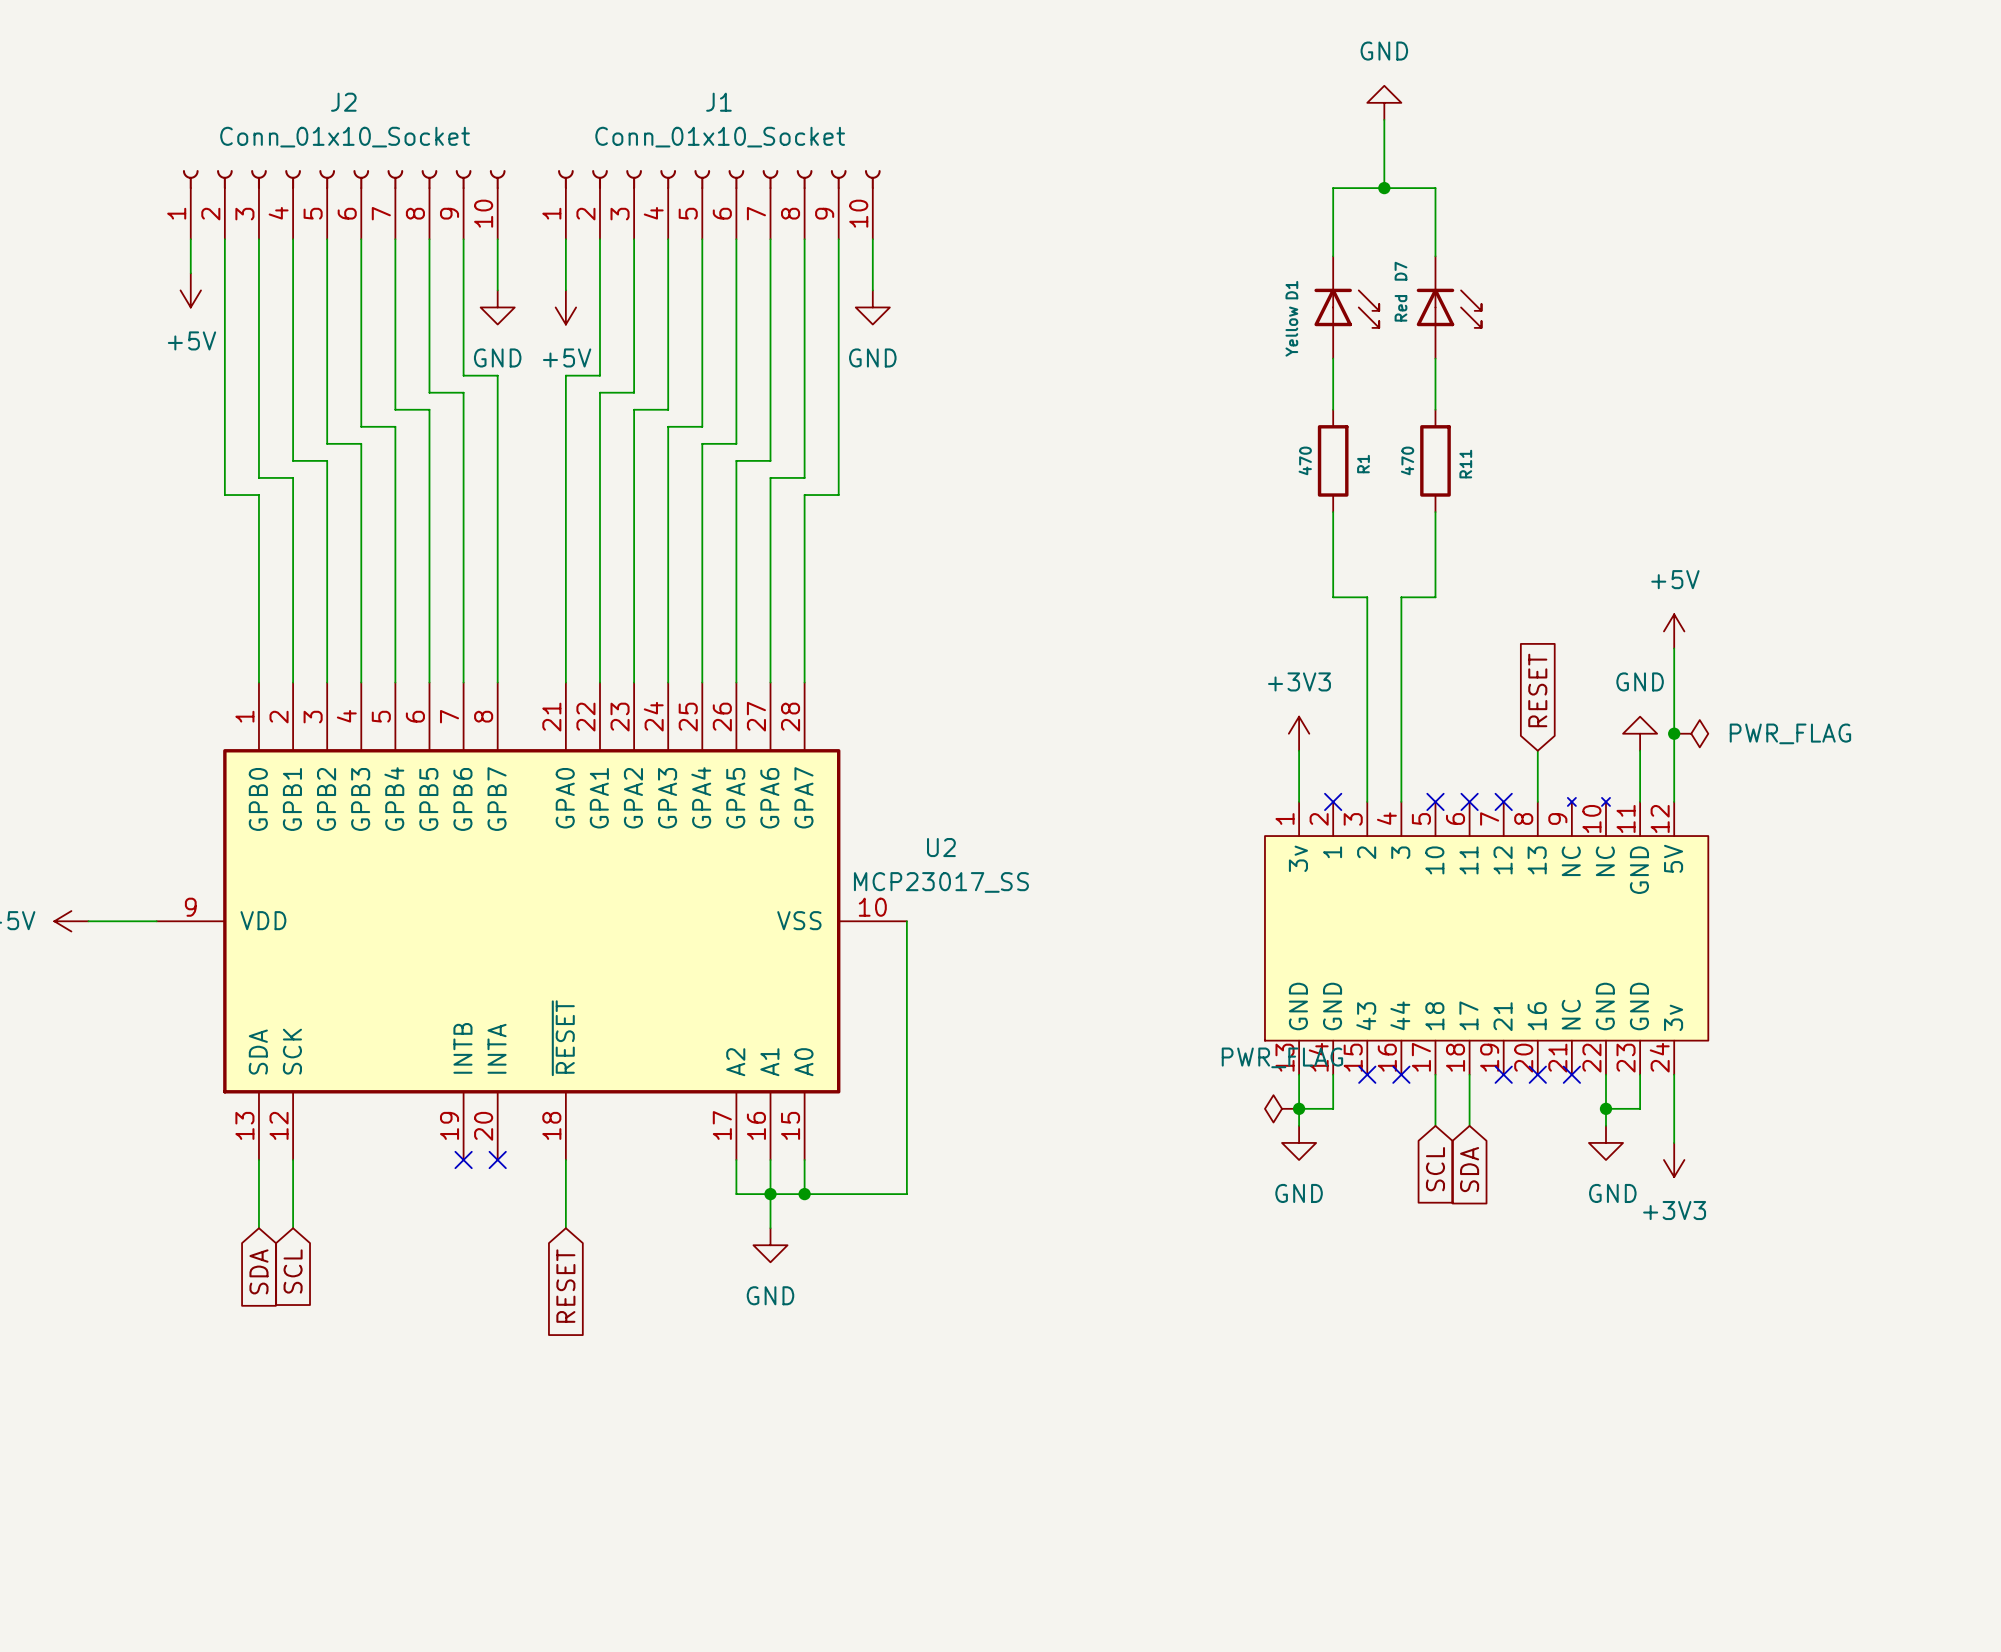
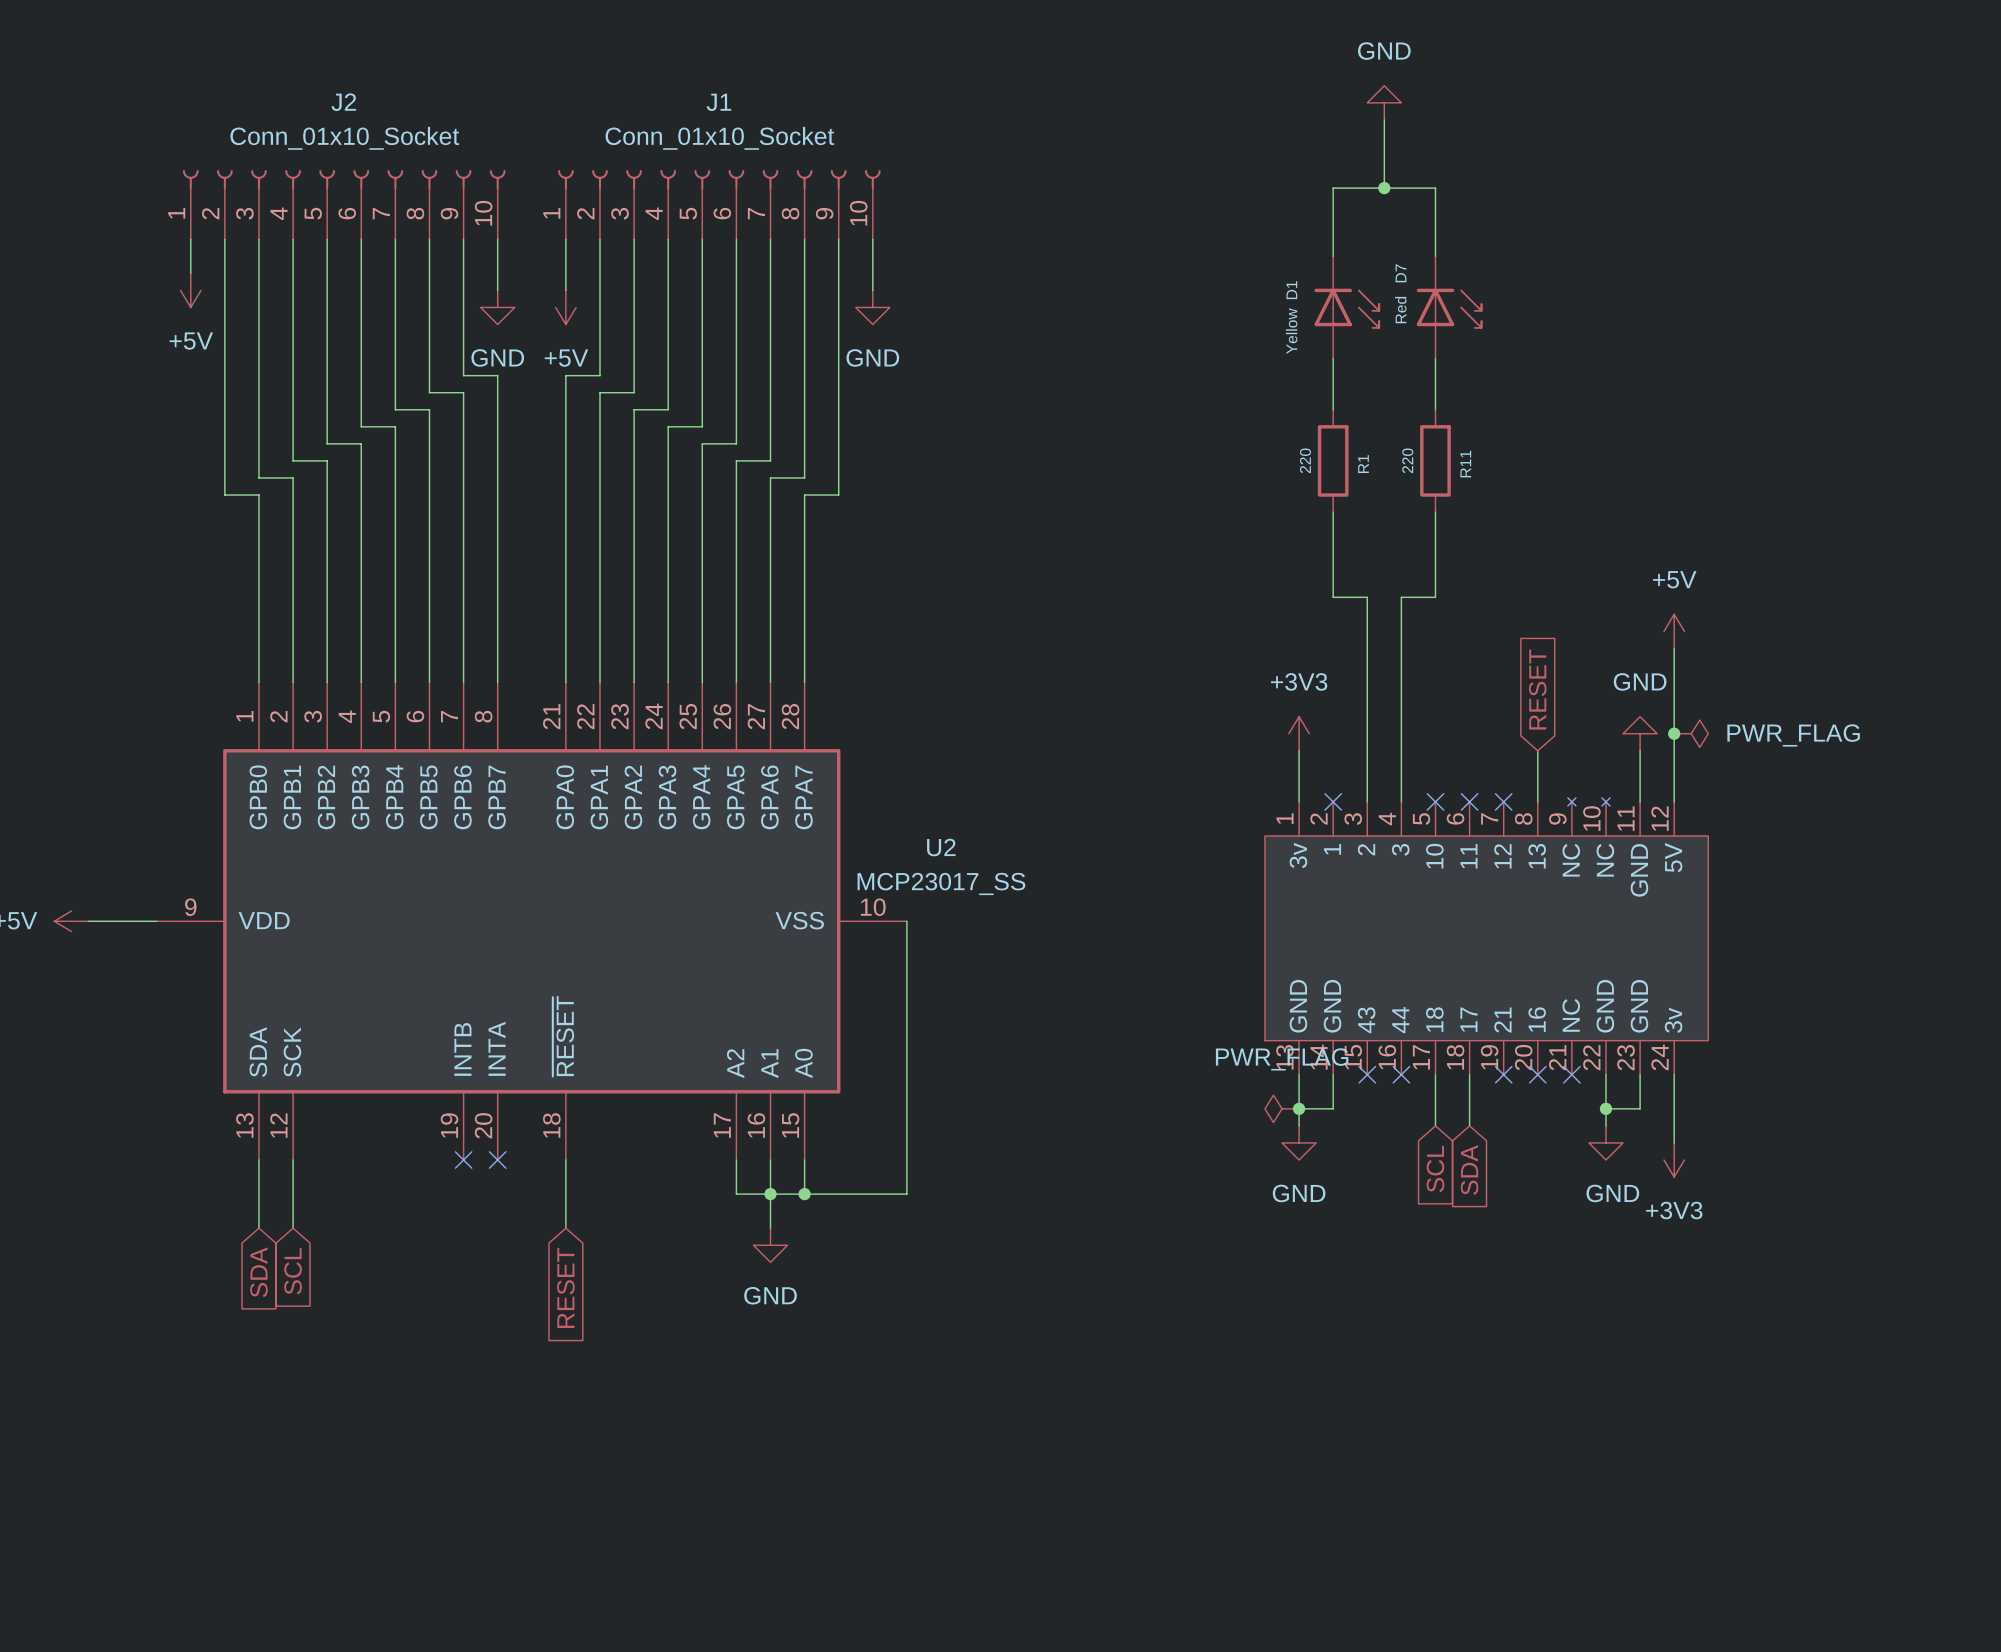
R1 value: 470 (1305, 460) -> 220 (1305, 460)
R11 value: 470 (1407, 460) -> 220 (1407, 460)

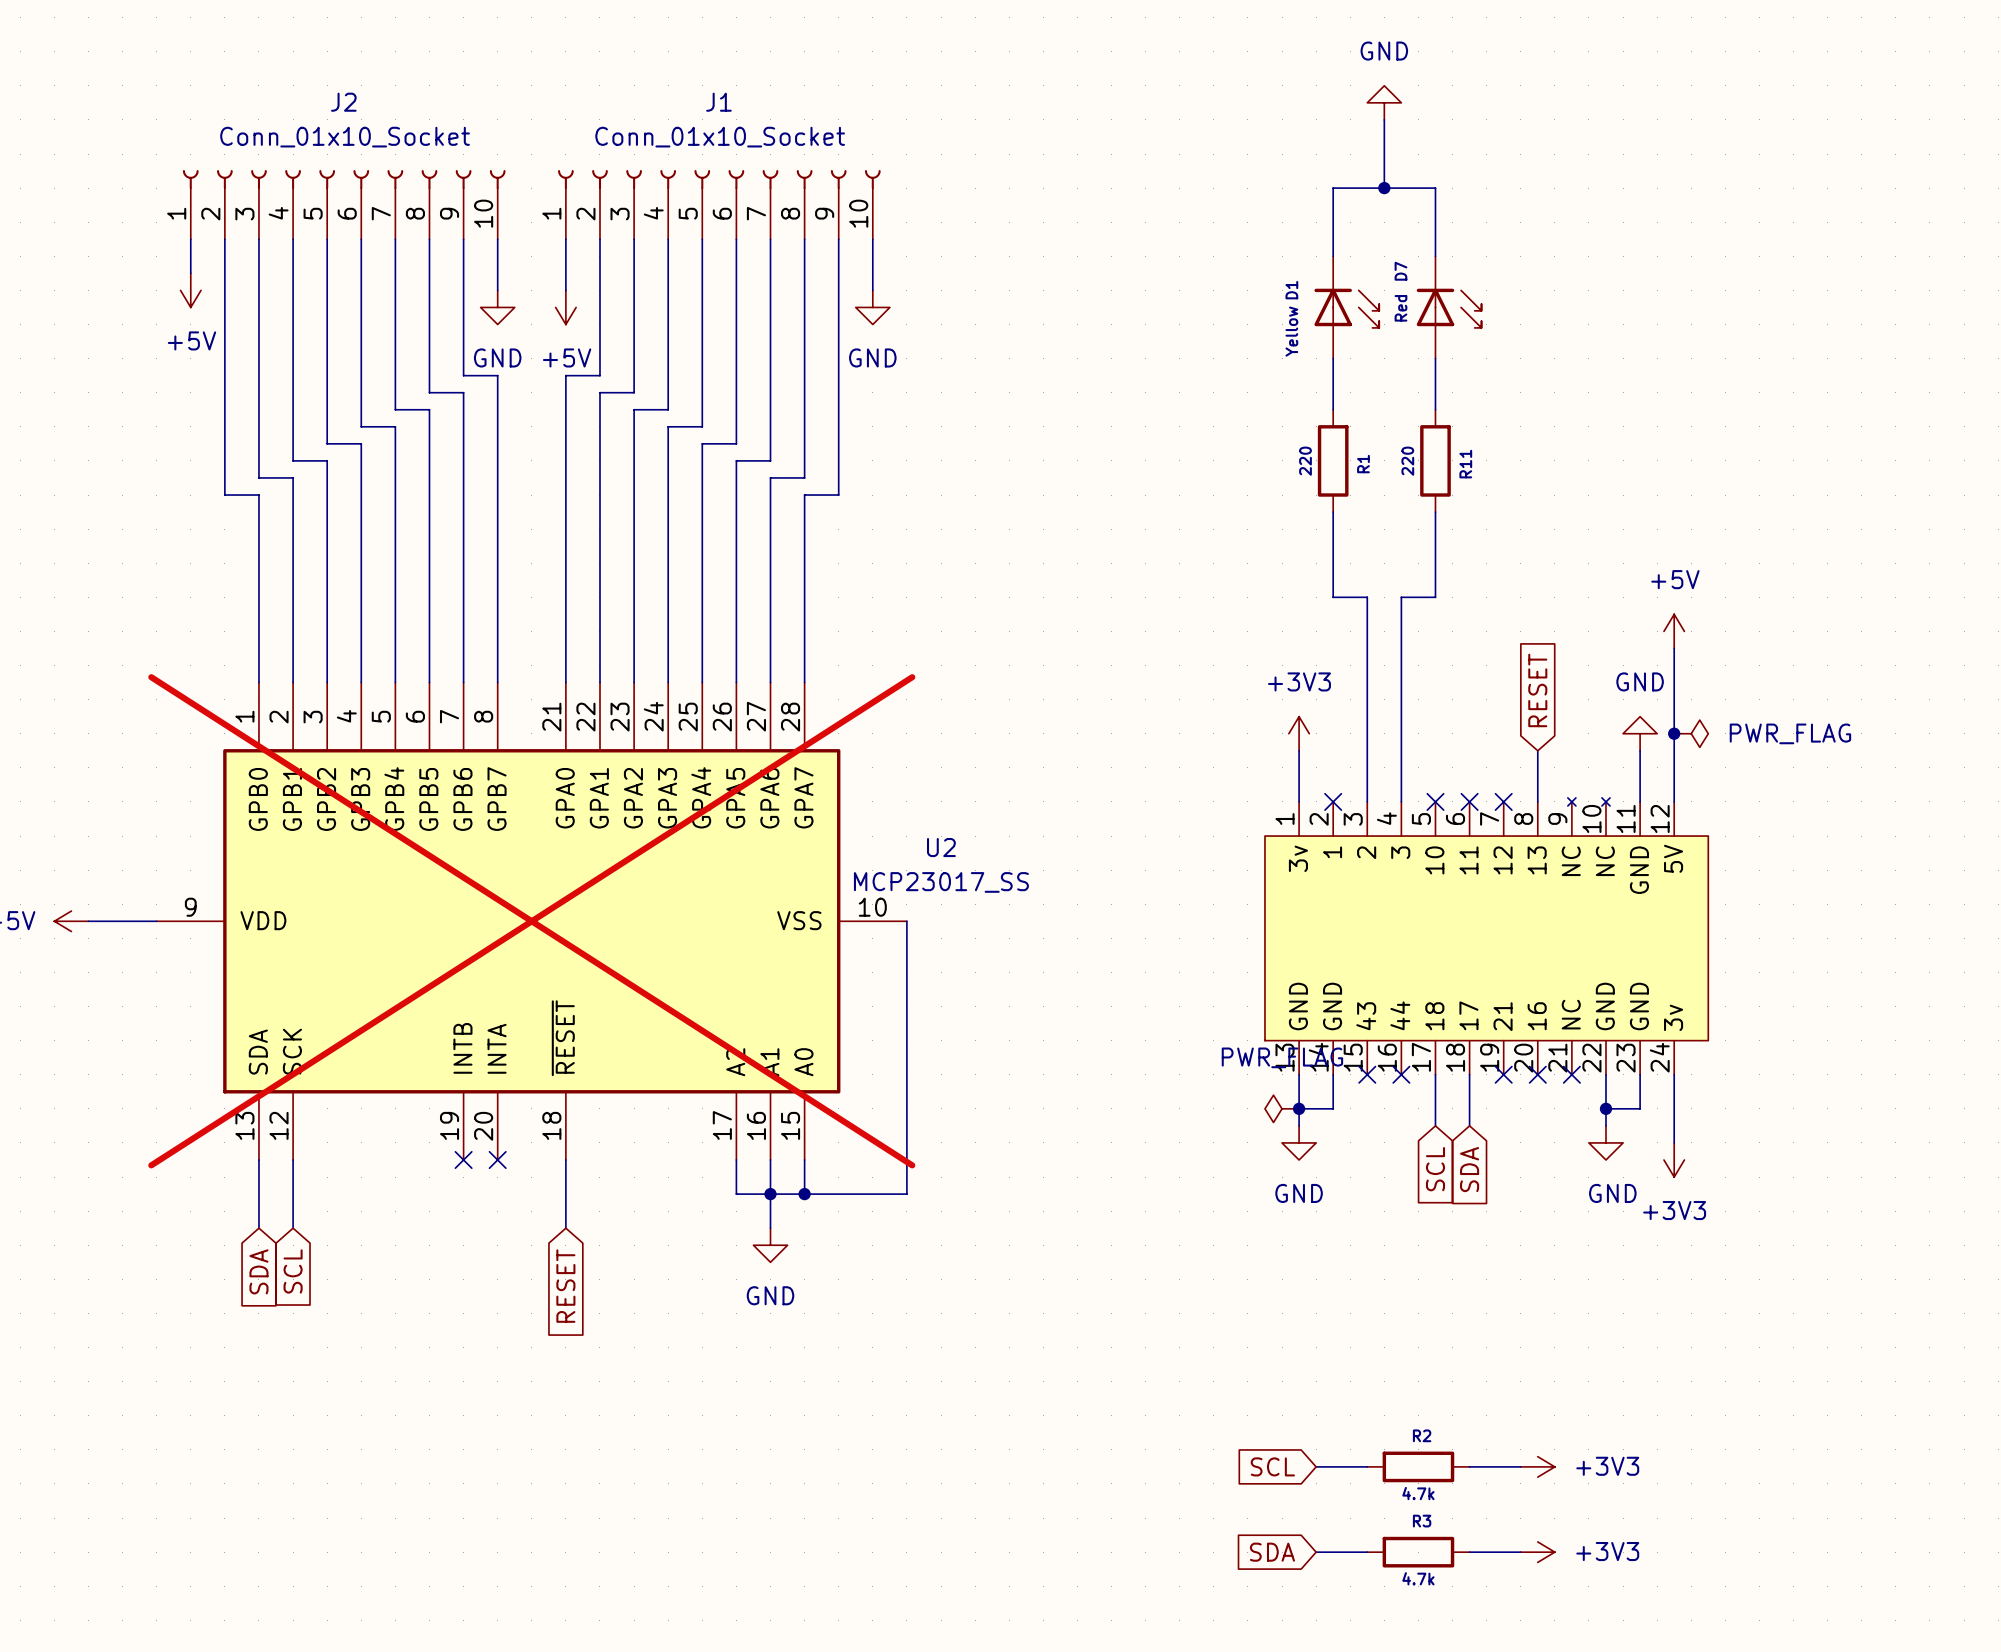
U2 do-not-place cross: none -> (531, 921)
global label: none -> SCL (1272, 1466)
wire: none -> (1316, 1466) (1367, 1466)
R2: none -> 4.7k (1418, 1466)
wire: none -> (1469, 1466) (1520, 1466)
power symbol: none -> +3V3 (1537, 1466)
global label: none -> SDA (1272, 1552)
wire: none -> (1316, 1552) (1367, 1552)
R3: none -> 4.7k (1418, 1552)
wire: none -> (1469, 1552) (1520, 1552)
power symbol: none -> +3V3 (1537, 1552)

